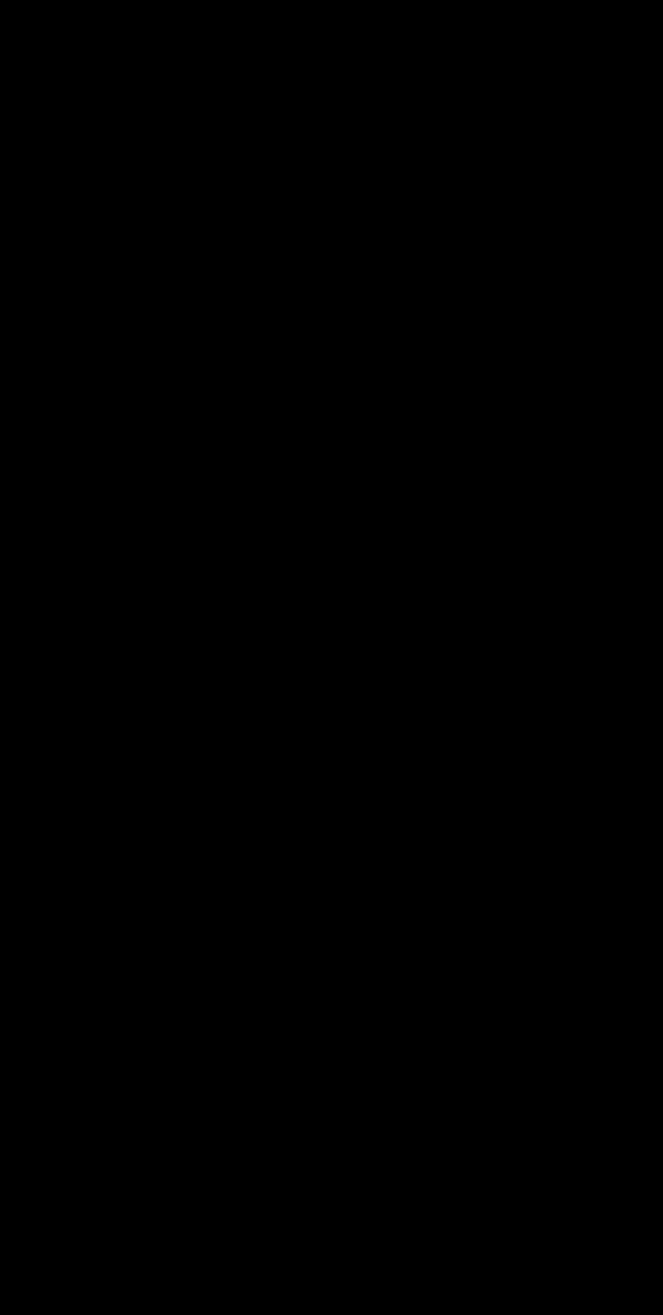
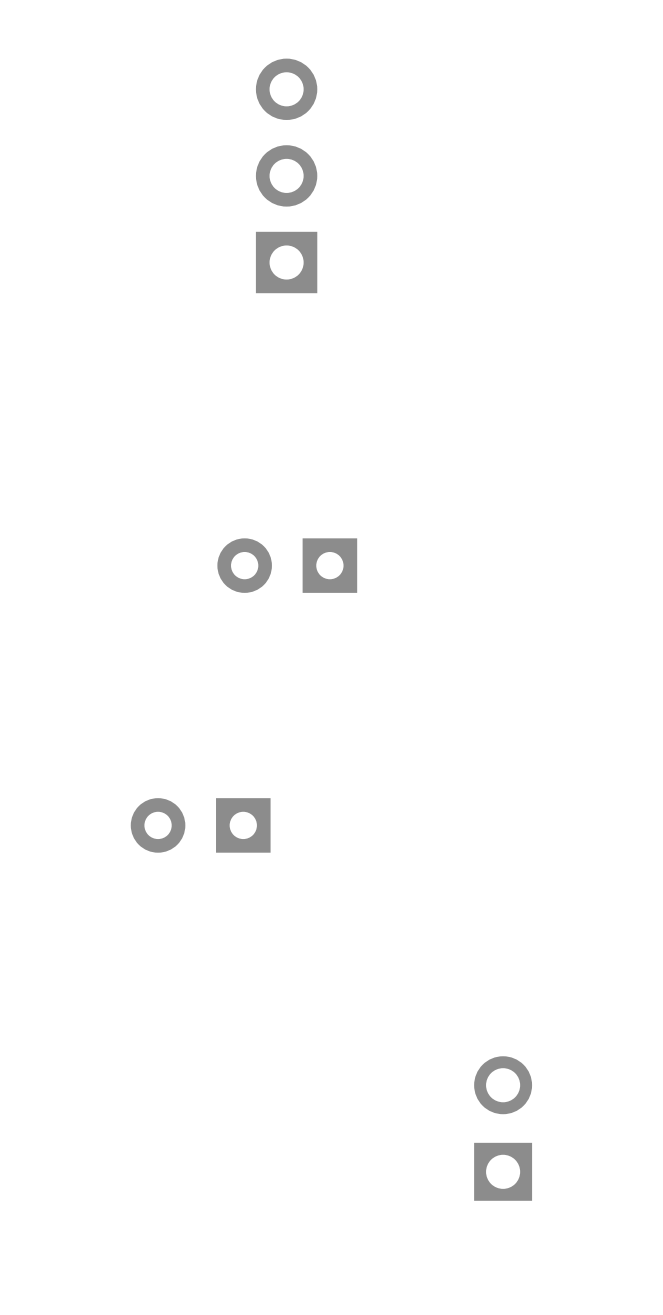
part: none -> (286, 175)
part: none -> (287, 565)
part: none -> (200, 825)
part: none -> (503, 1128)

